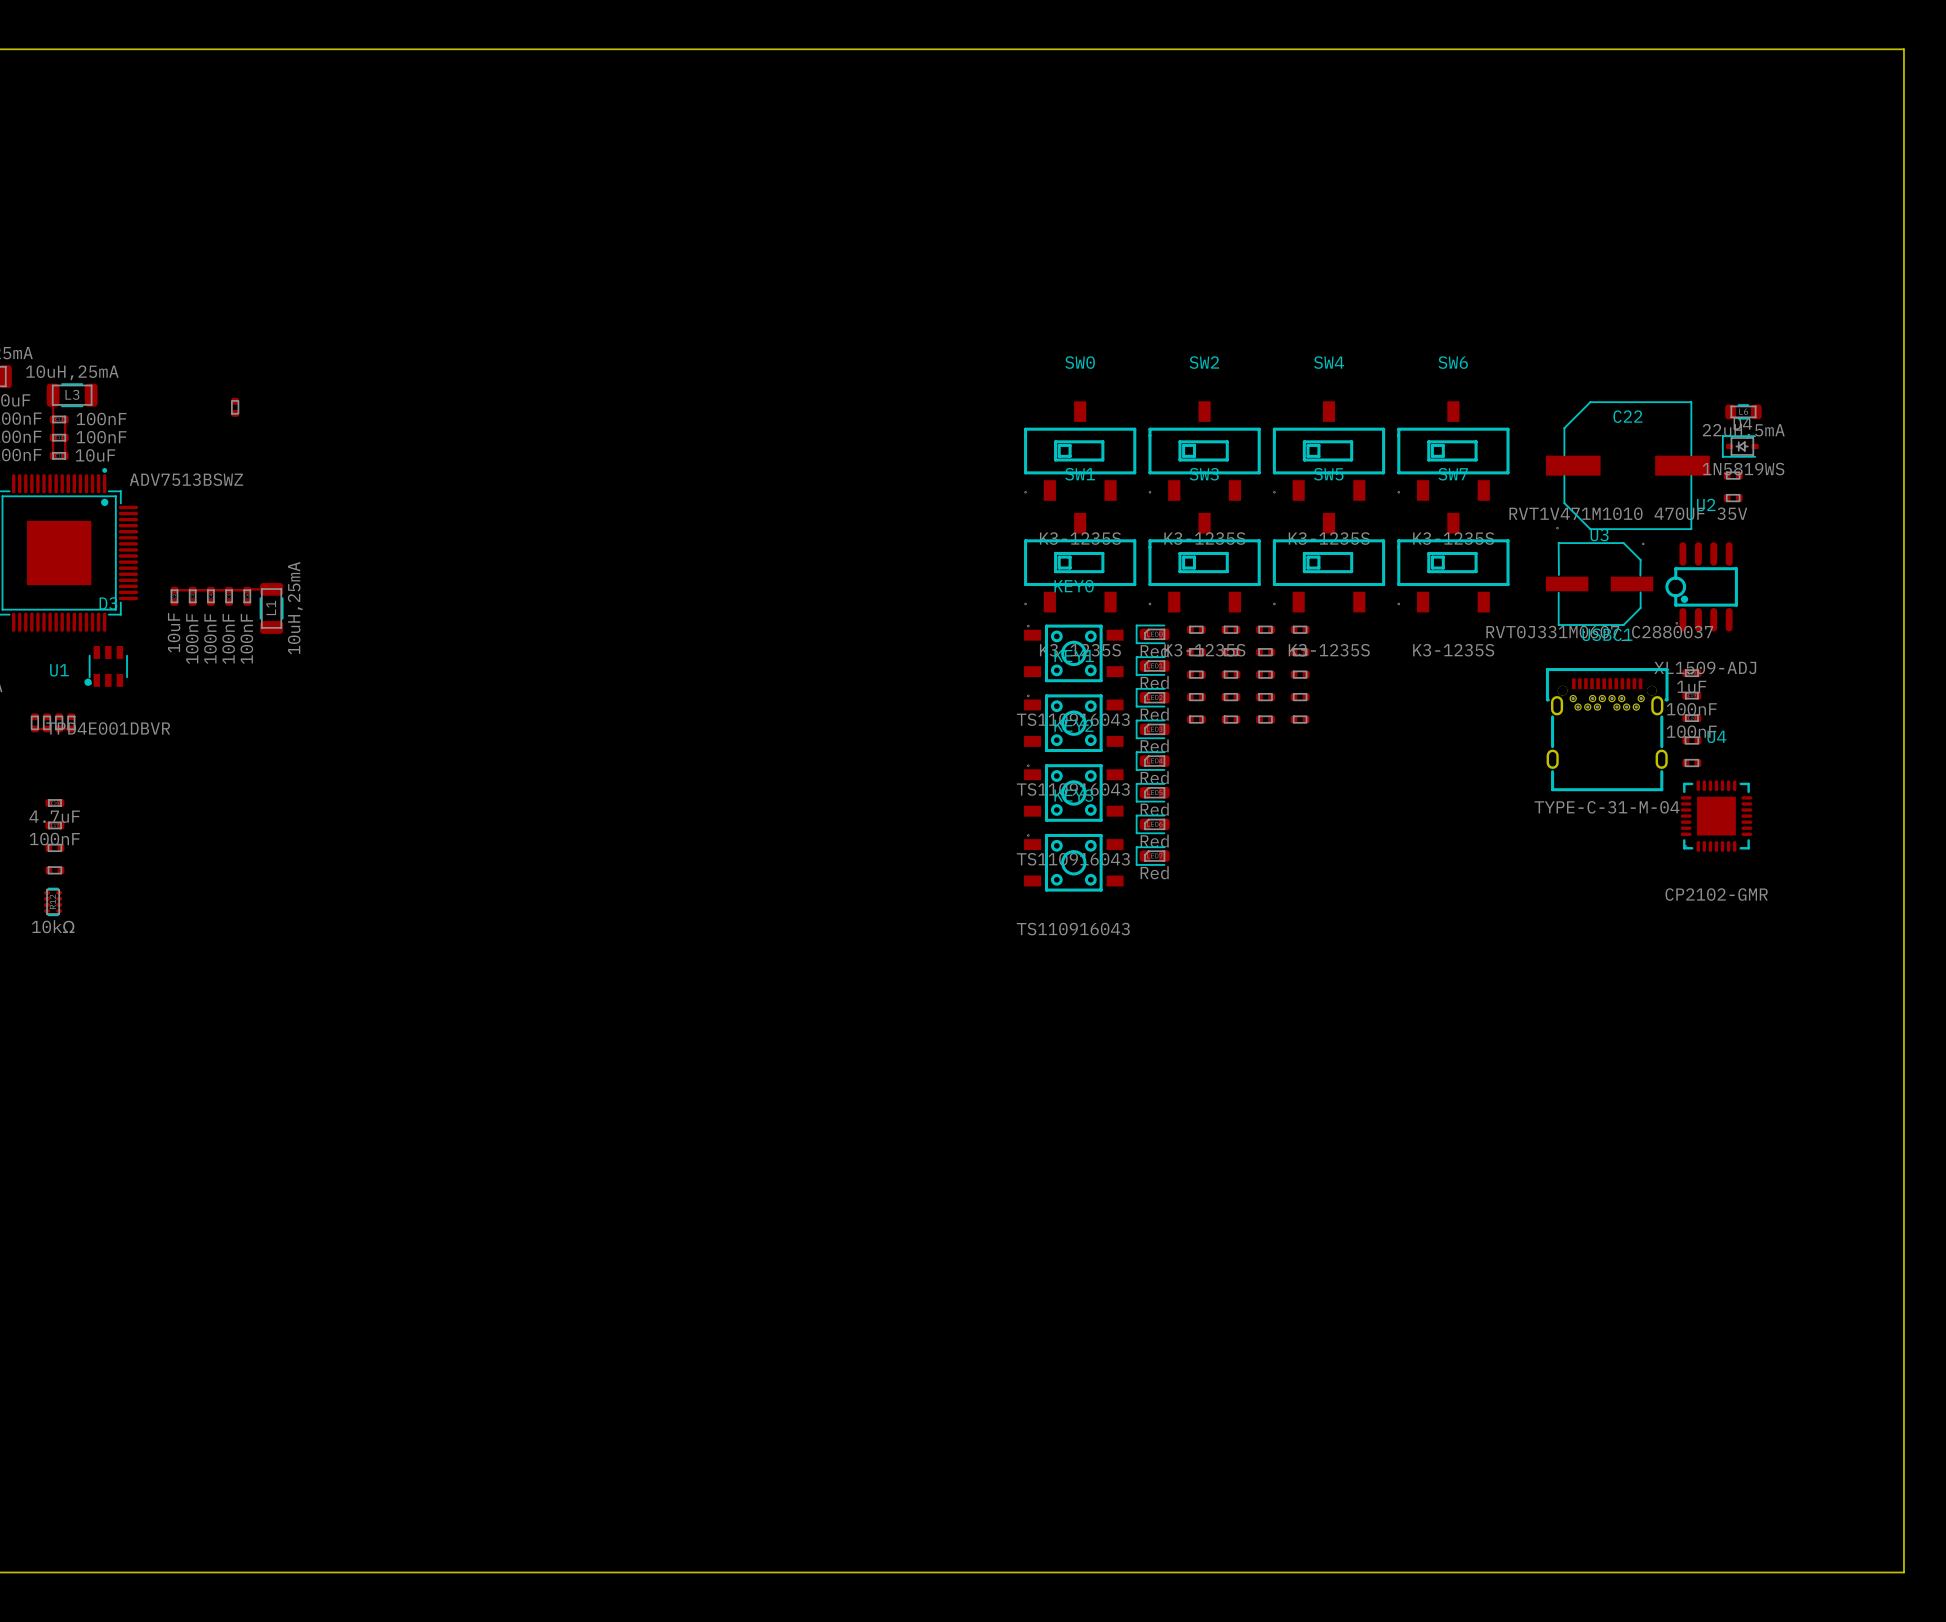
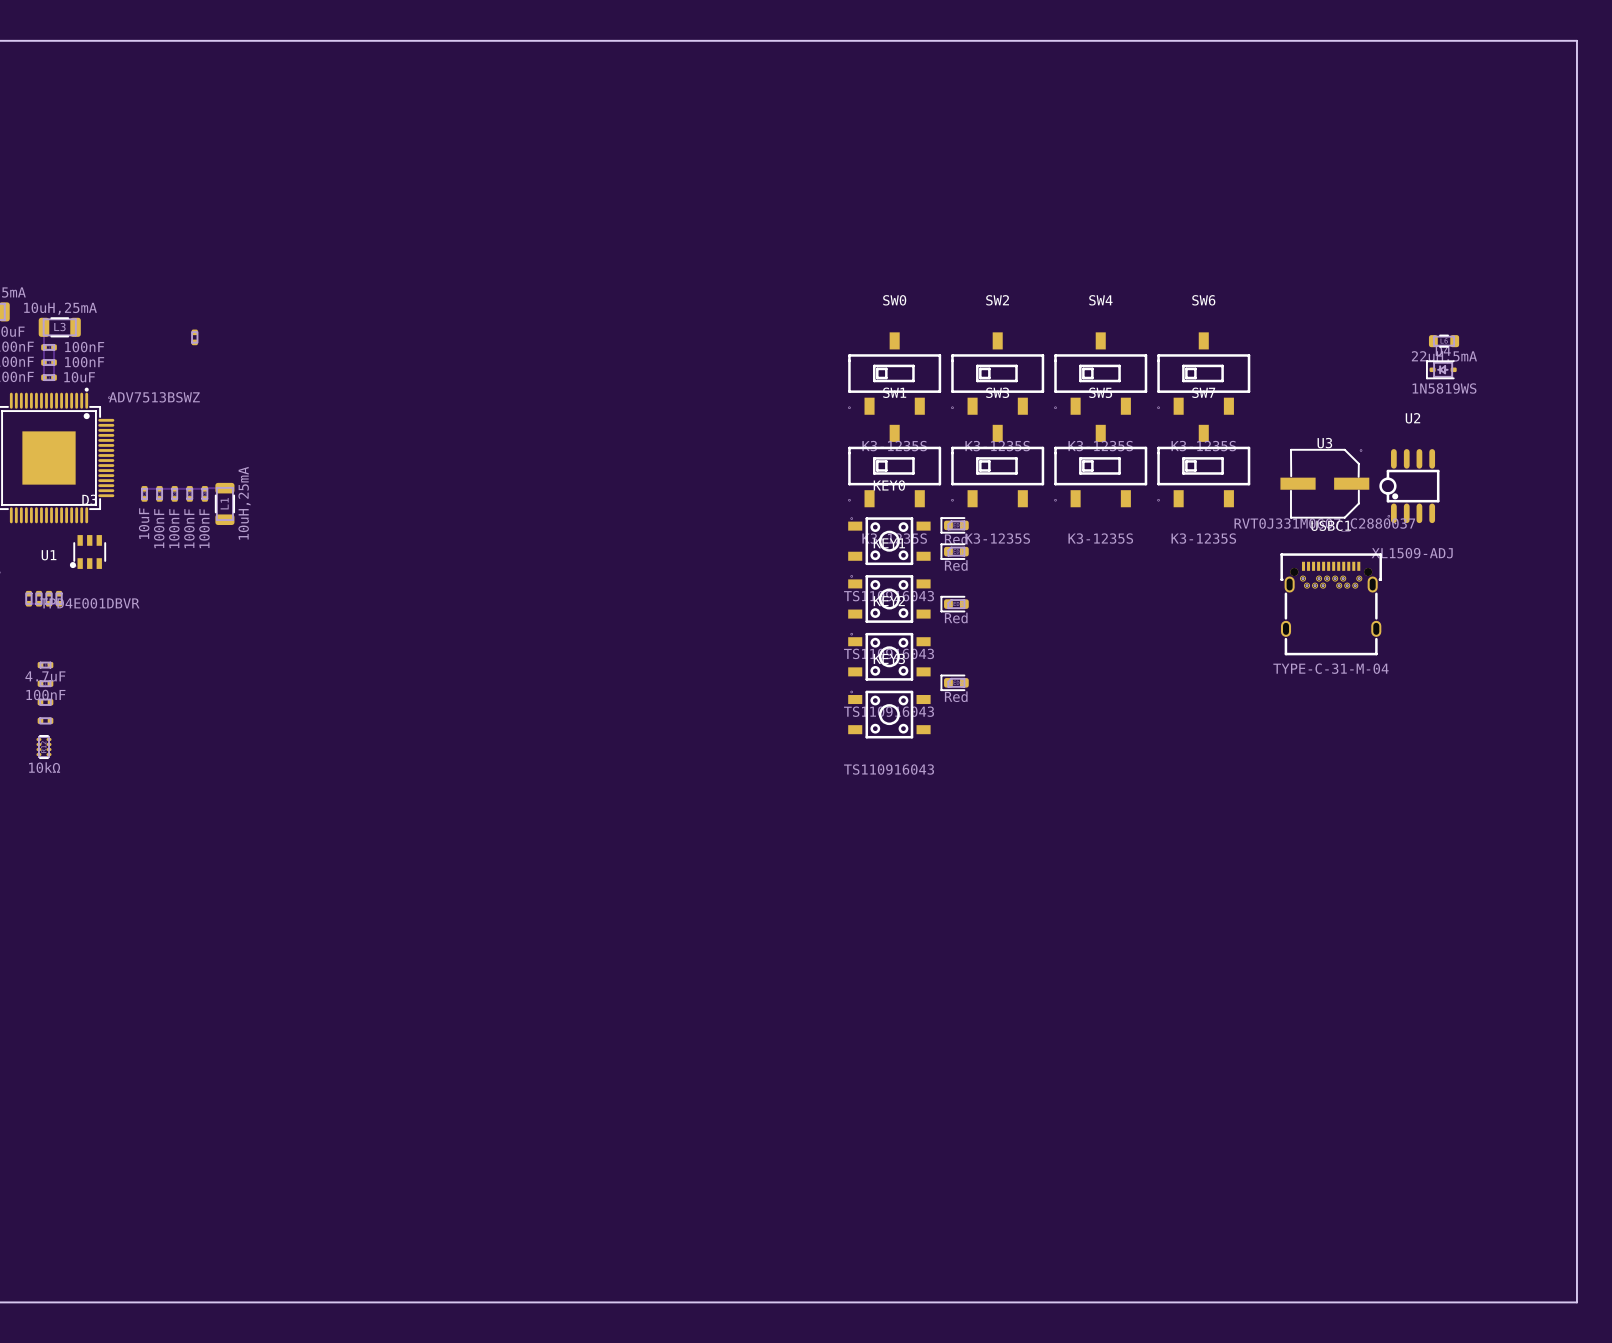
C22: RVT1V471M1010 470UF 35V (1627, 465) -> none
part: (1733, 475) -> none
part: (1733, 498) -> none
part: (1196, 629) -> none
part: (1230, 629) -> none
part: (1265, 629) -> none
part: (1300, 629) -> none
part: (1196, 652) -> none
part: (1230, 652) -> none
part: (1265, 652) -> none
part: (1300, 652) -> none
part: 1uF (1691, 673) -> none
part: (1196, 674) -> none
part: (1230, 674) -> none
part: (1265, 674) -> none
part: (1300, 674) -> none
part: 100nF (1691, 695) -> none
part: Red (1152, 697) -> none
part: (1196, 697) -> none
part: (1230, 697) -> none
part: (1265, 697) -> none
part: (1300, 697) -> none
part: 100nF (1691, 718) -> none
part: (1196, 719) -> none
part: (1230, 719) -> none
part: (1265, 719) -> none
part: (1300, 719) -> none
part: (1691, 740) -> none
part: Red (1152, 761) -> none
part: (1691, 763) -> none
part: Red (1152, 792) -> none
U4: CP2102-GMR (1716, 817) -> none
part: Red (1152, 856) -> none

